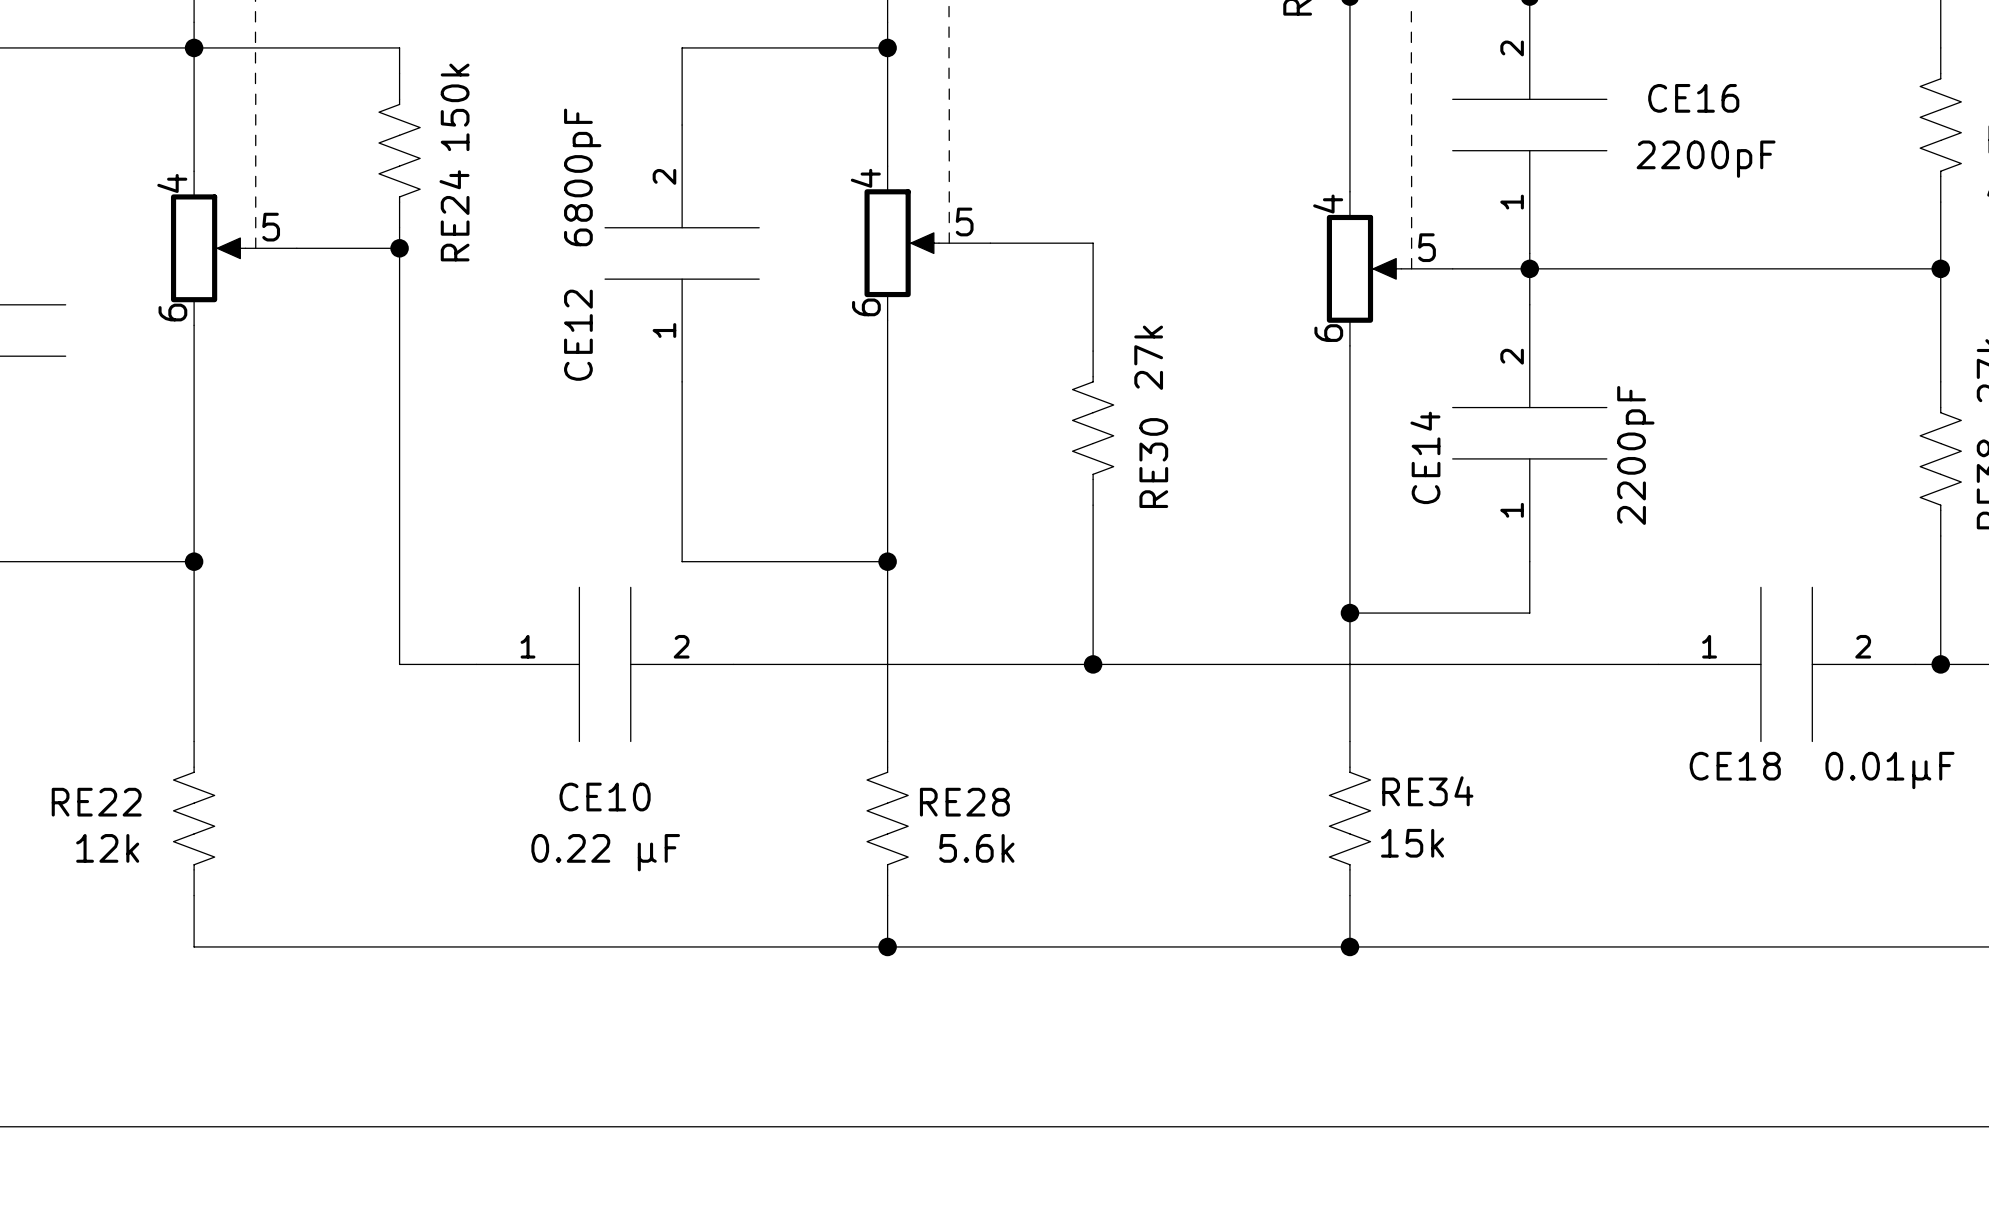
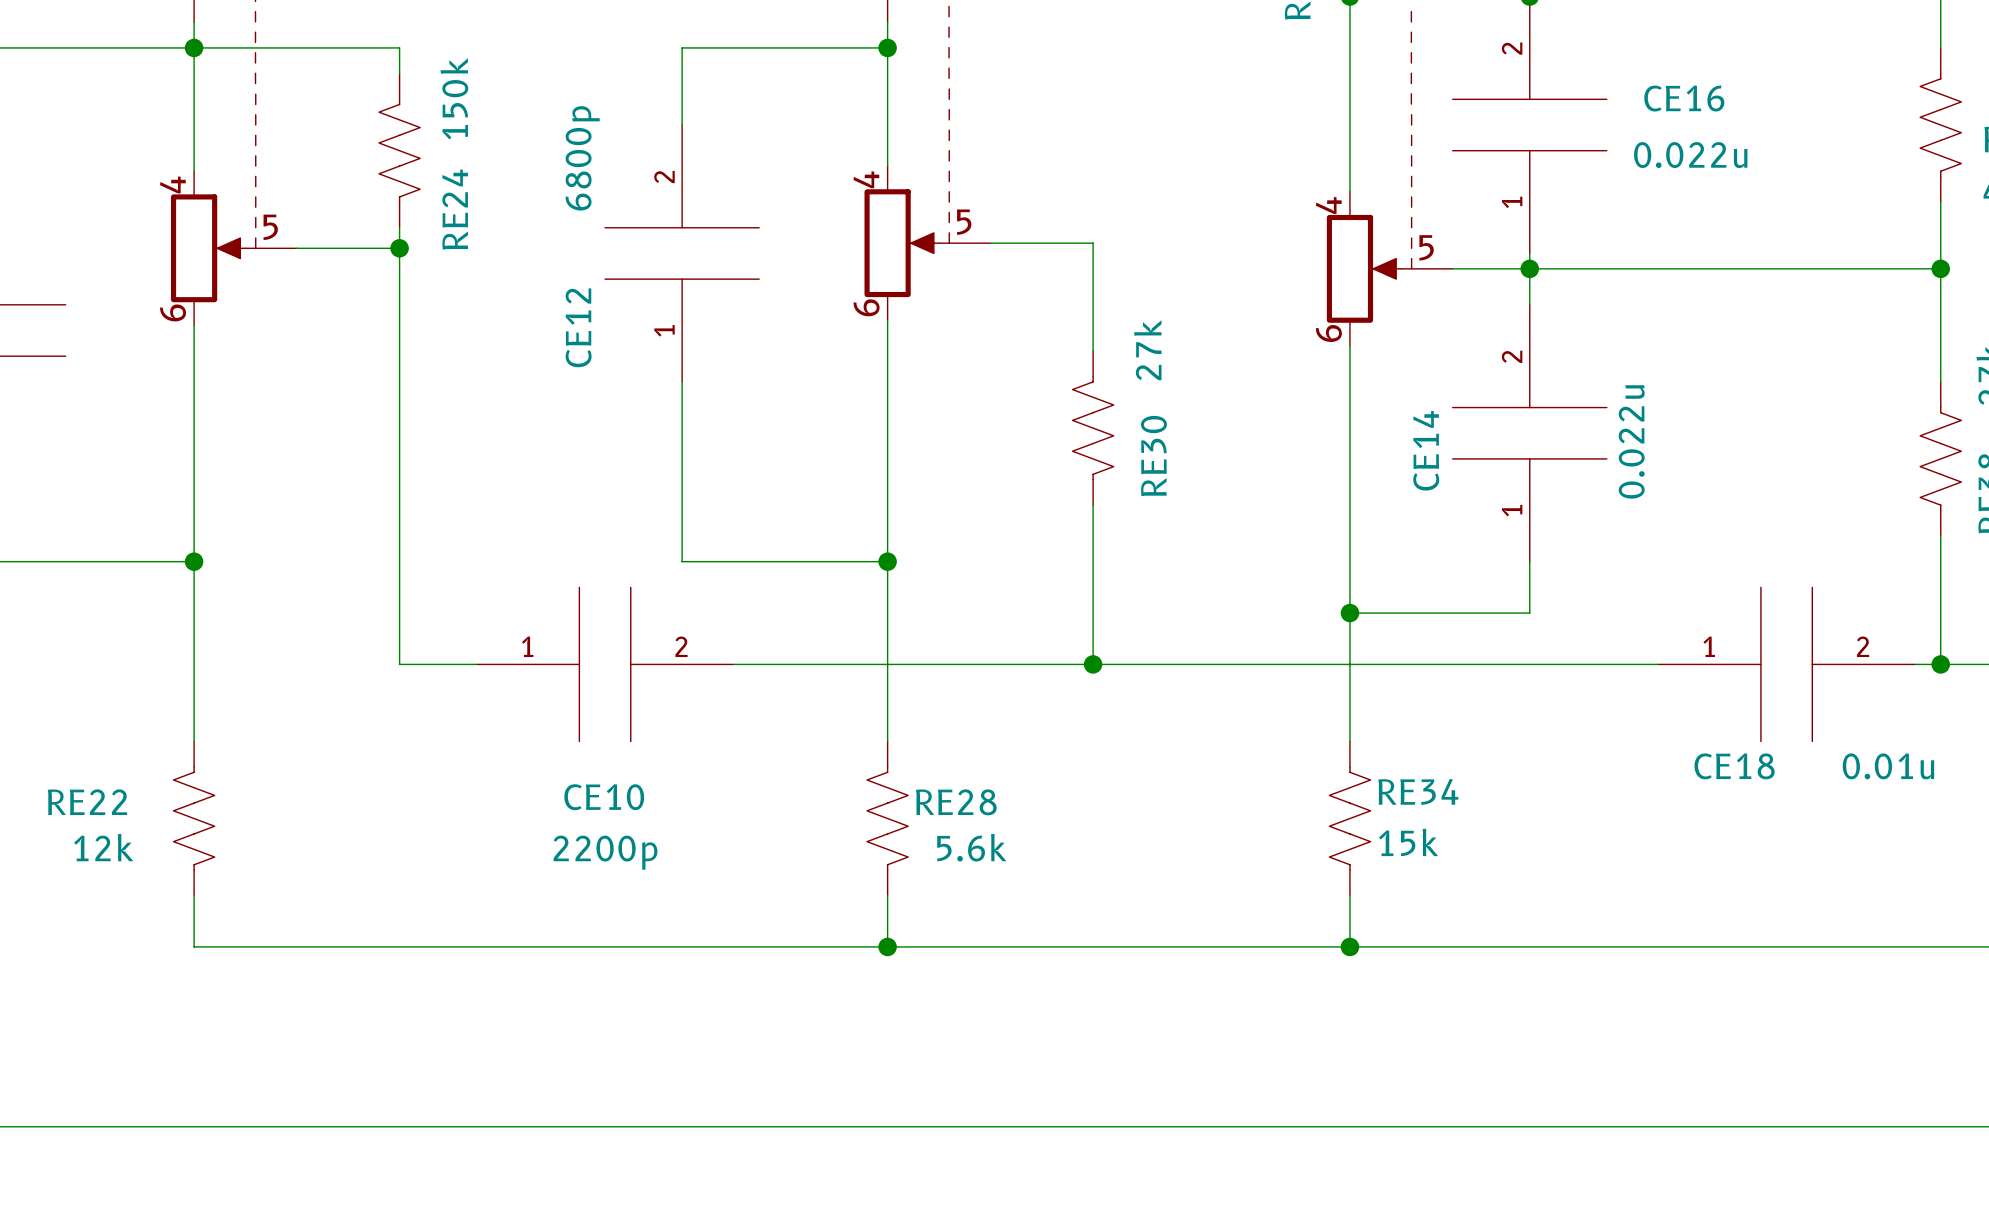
CE16 value: 2200pF (1706, 159) -> 0.022u (1690, 155)
CE12 value: 6800pF (582, 177) -> 6800p (582, 158)
CE14 value: 2200pF (1635, 455) -> 0.022u (1631, 441)
CE18 value: 0.01µF (1889, 770) -> 0.01u (1888, 766)
CE10 value: 0.22 µF (605, 852) -> 2200p (605, 852)

